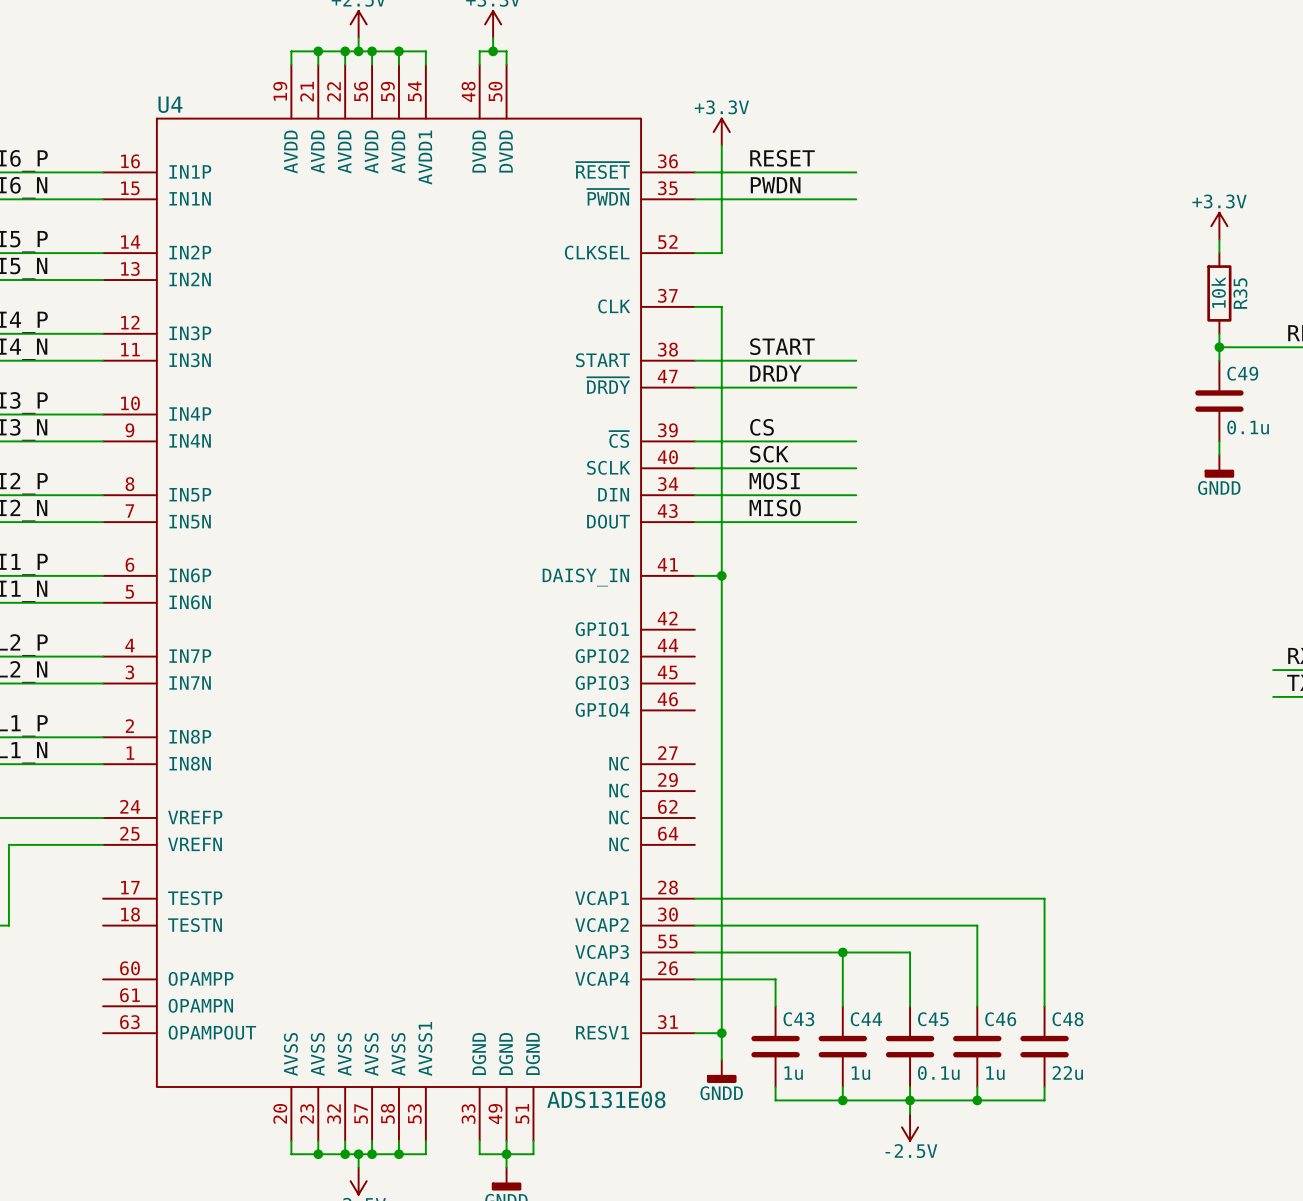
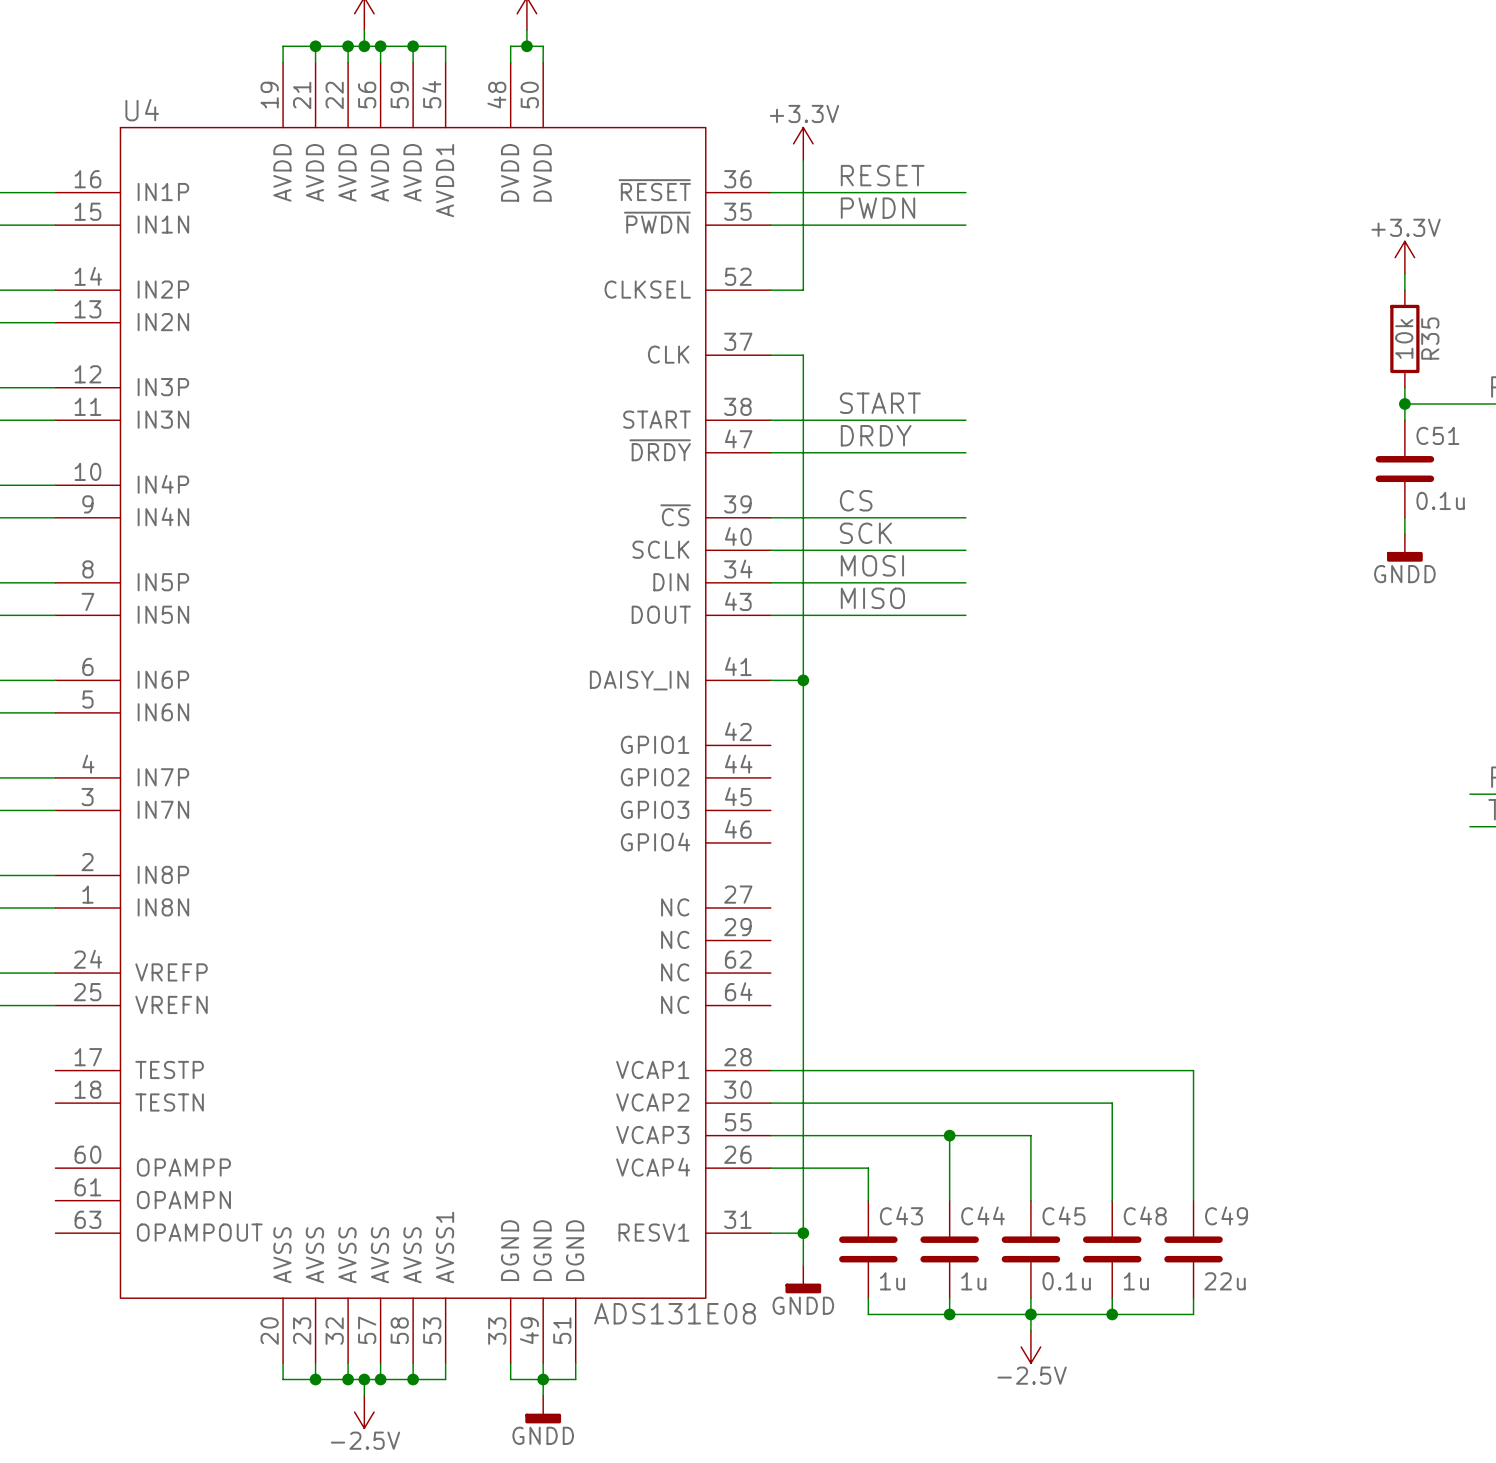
C49 name: C49 (1242, 373) -> C51 (1437, 435)
C46 name: C46 (1000, 1019) -> C48 (1145, 1215)
C48 name: C48 (1067, 1019) -> C49 (1226, 1215)

